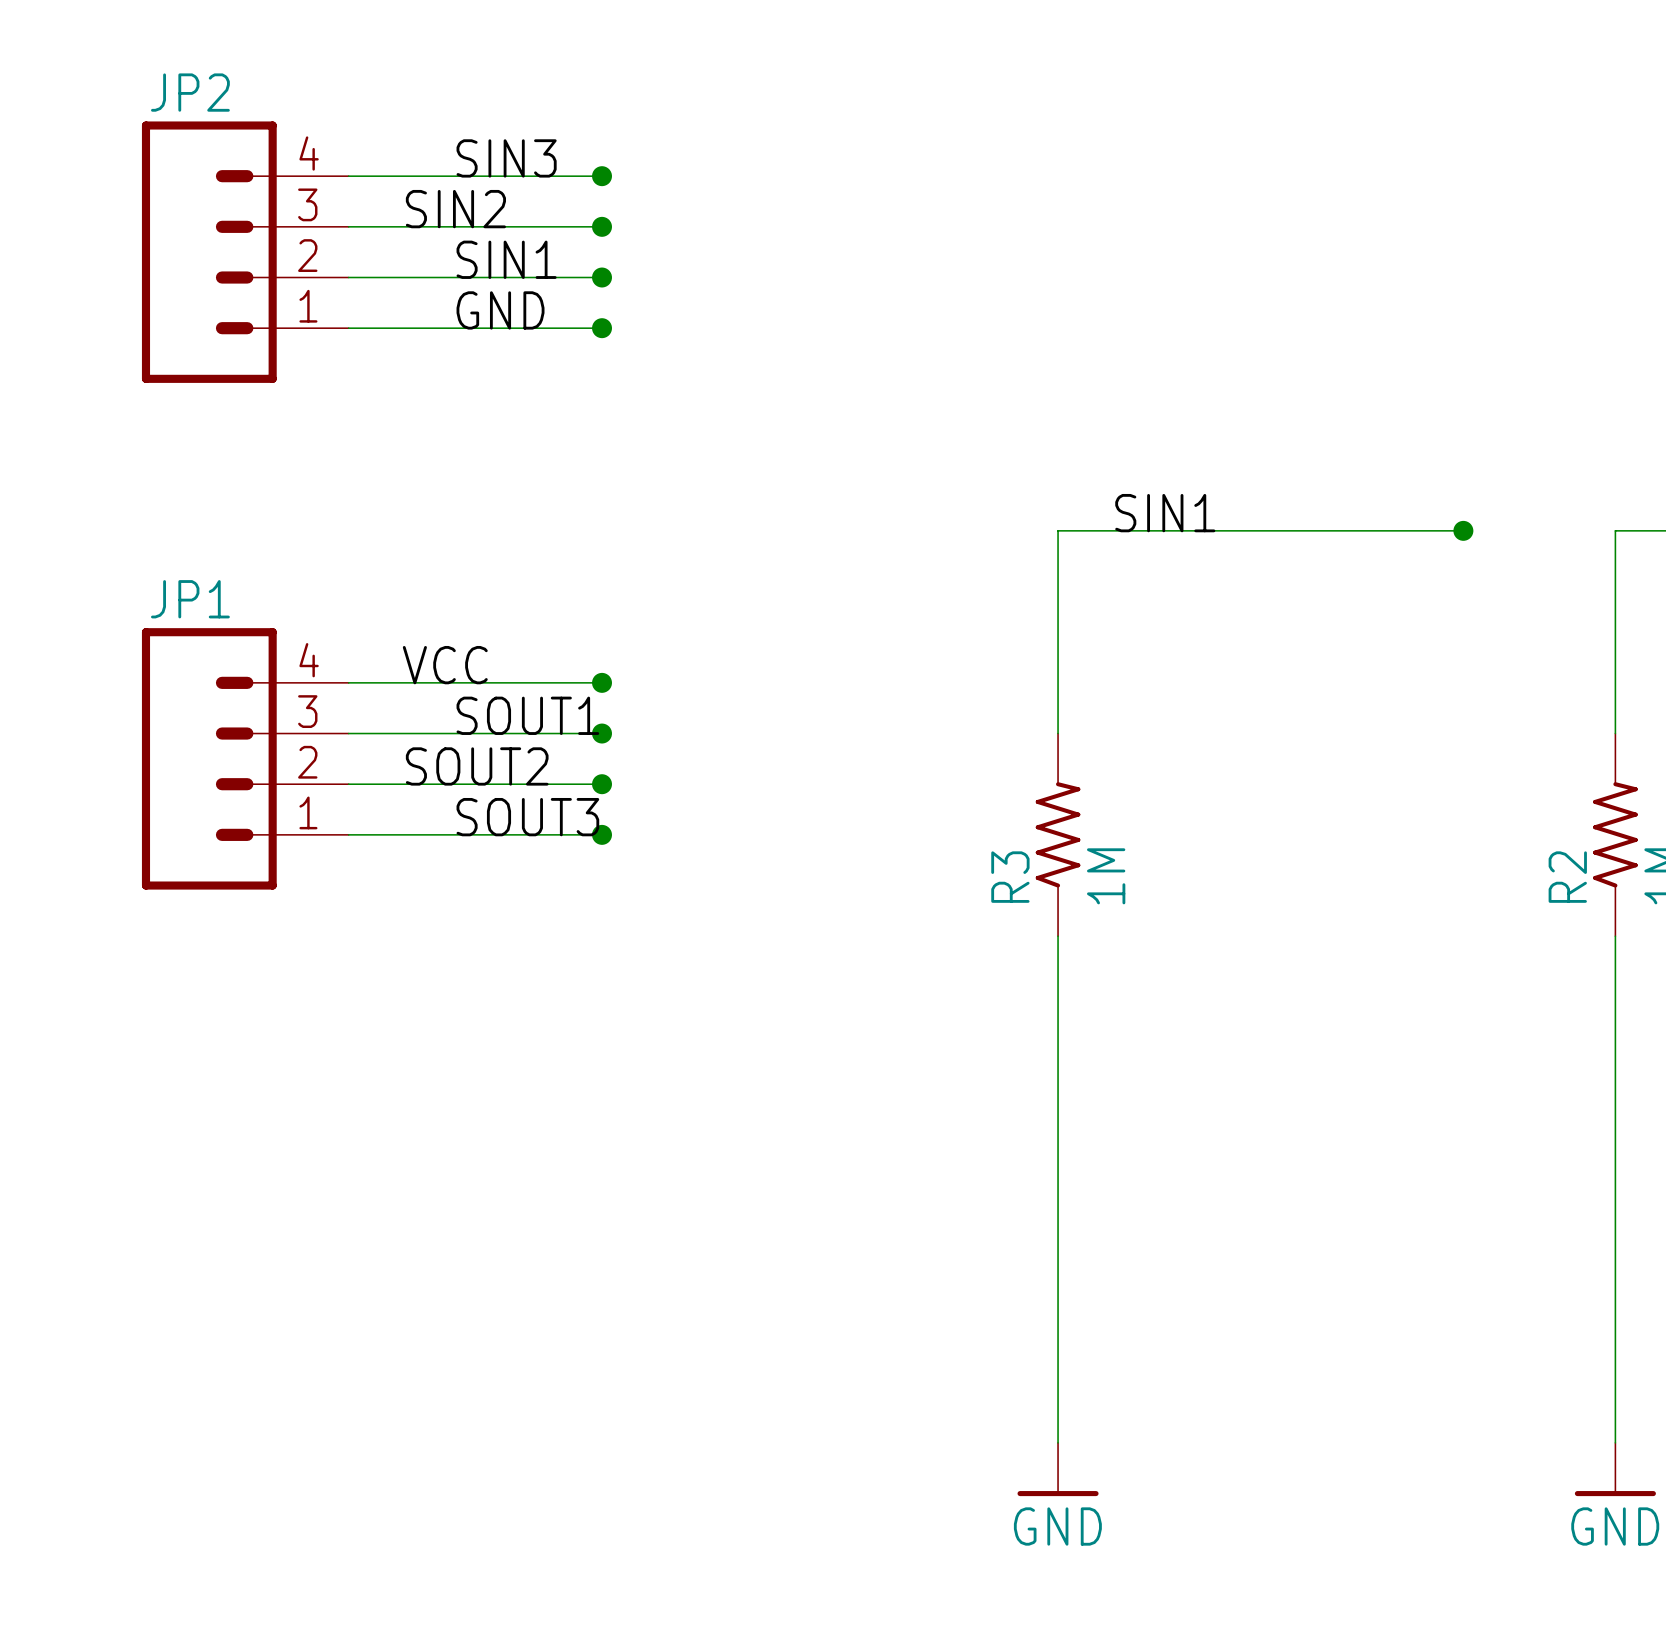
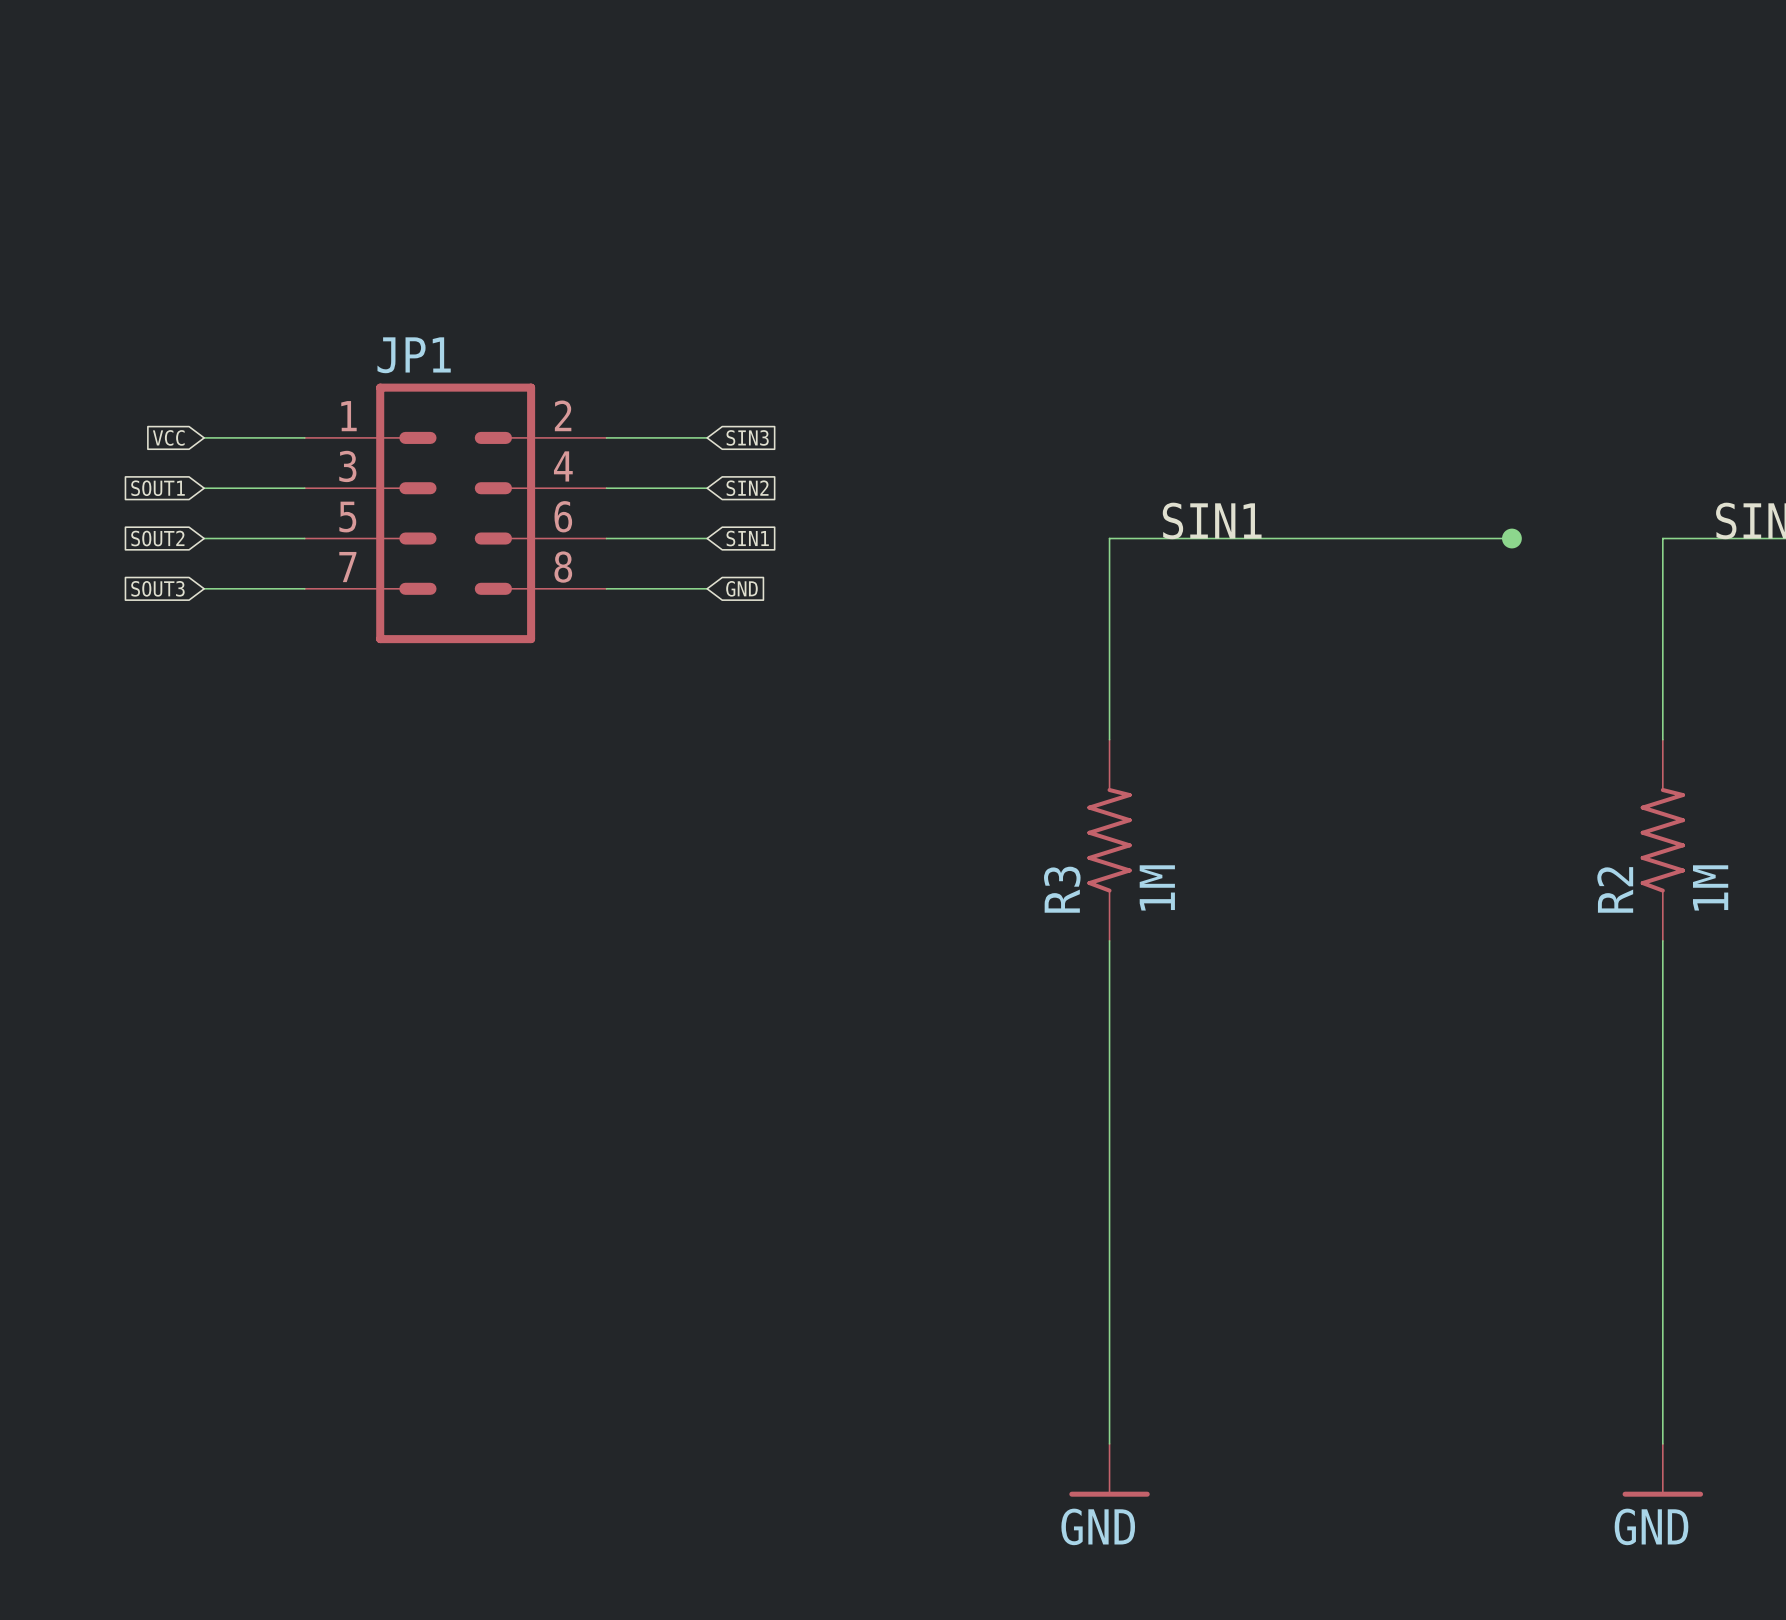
label: SIN3 (506, 158) -> none
wire: (348, 176) (602, 176) -> none
junction: (602, 176) -> none
label: SIN2 (455, 209) -> none
wire: (348, 226) (602, 226) -> none
junction: (602, 226) -> none
JP2: (245, 252) -> none
label: SIN1 (506, 259) -> none
wire: (348, 277) (602, 277) -> none
junction: (602, 277) -> none
label: GND (500, 310) -> none
wire: (348, 328) (602, 328) -> none
junction: (602, 328) -> none
global label: none -> VCC (168, 437)
wire: none -> (204, 437) (304, 437)
wire: none -> (606, 437) (707, 437)
global label: none -> SIN3 (747, 437)
global label: none -> SOUT1 (158, 488)
wire: none -> (204, 488) (304, 488)
wire: none -> (606, 488) (707, 488)
global label: none -> SIN2 (747, 488)
global label: none -> SOUT2 (157, 538)
wire: none -> (204, 538) (304, 538)
wire: none -> (606, 538) (707, 538)
global label: none -> SIN1 (747, 538)
global label: none -> SOUT3 (157, 588)
wire: none -> (204, 588) (304, 588)
wire: none -> (606, 588) (707, 588)
global label: none -> GND (741, 588)
JP1 symbol: [141, 628, 349, 890] -> [304, 383, 607, 644]
label: VCC (445, 665) -> none
wire: (348, 682) (602, 682) -> none
junction: (602, 682) -> none
label: SOUT1 (527, 715) -> none
wire: (348, 733) (602, 733) -> none
junction: (602, 733) -> none
label: SOUT2 (477, 766) -> none
wire: (348, 784) (602, 784) -> none
junction: (602, 784) -> none
label: SOUT3 (527, 817) -> none
wire: (348, 834) (602, 834) -> none
junction: (602, 834) -> none

